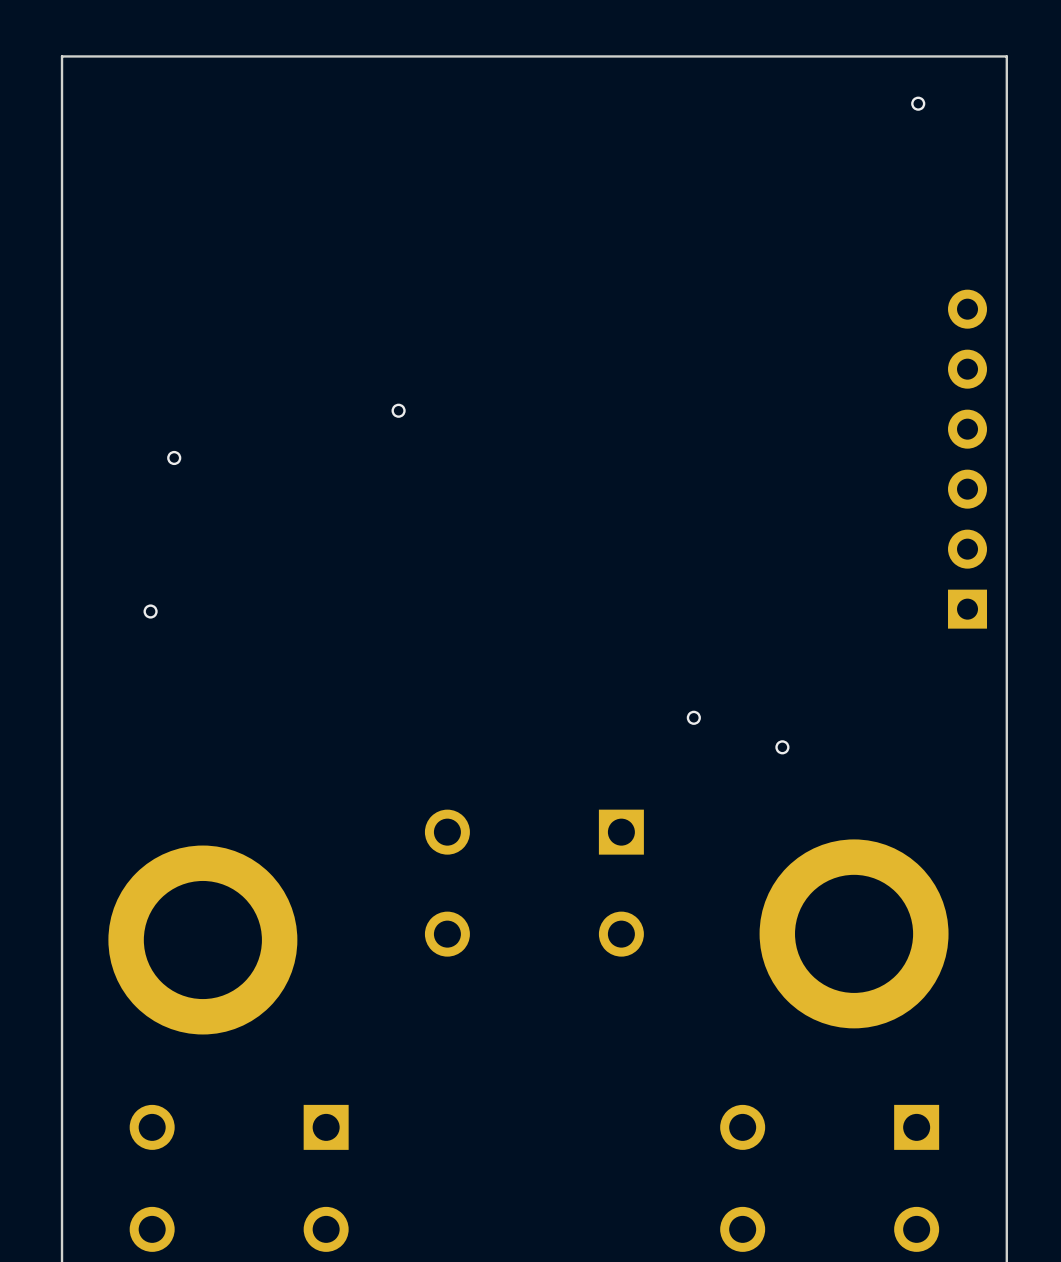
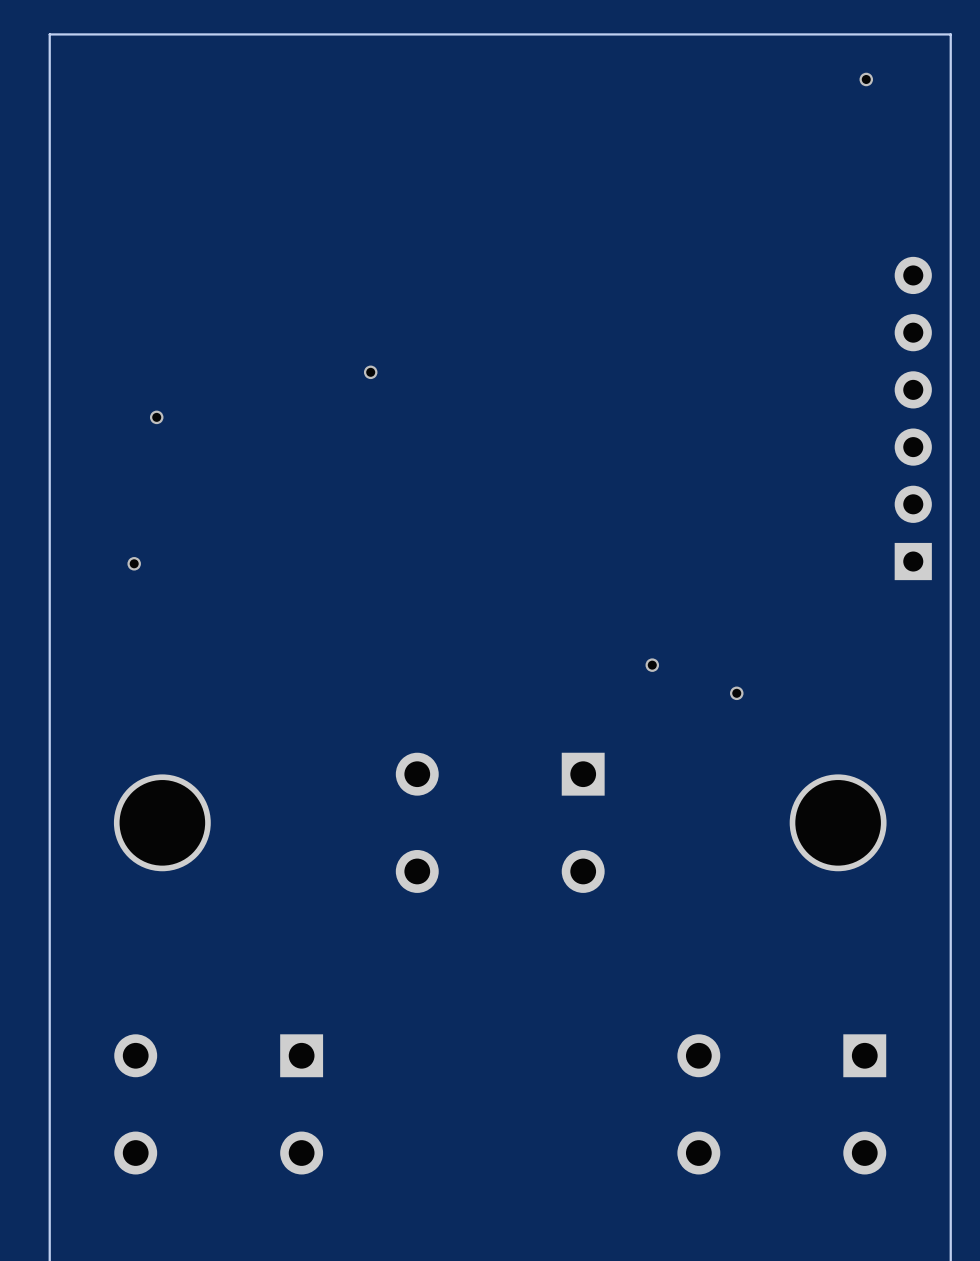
part: none -> (162, 822)
part: none -> (838, 822)
part: (854, 933) -> none
part: (202, 940) -> none

